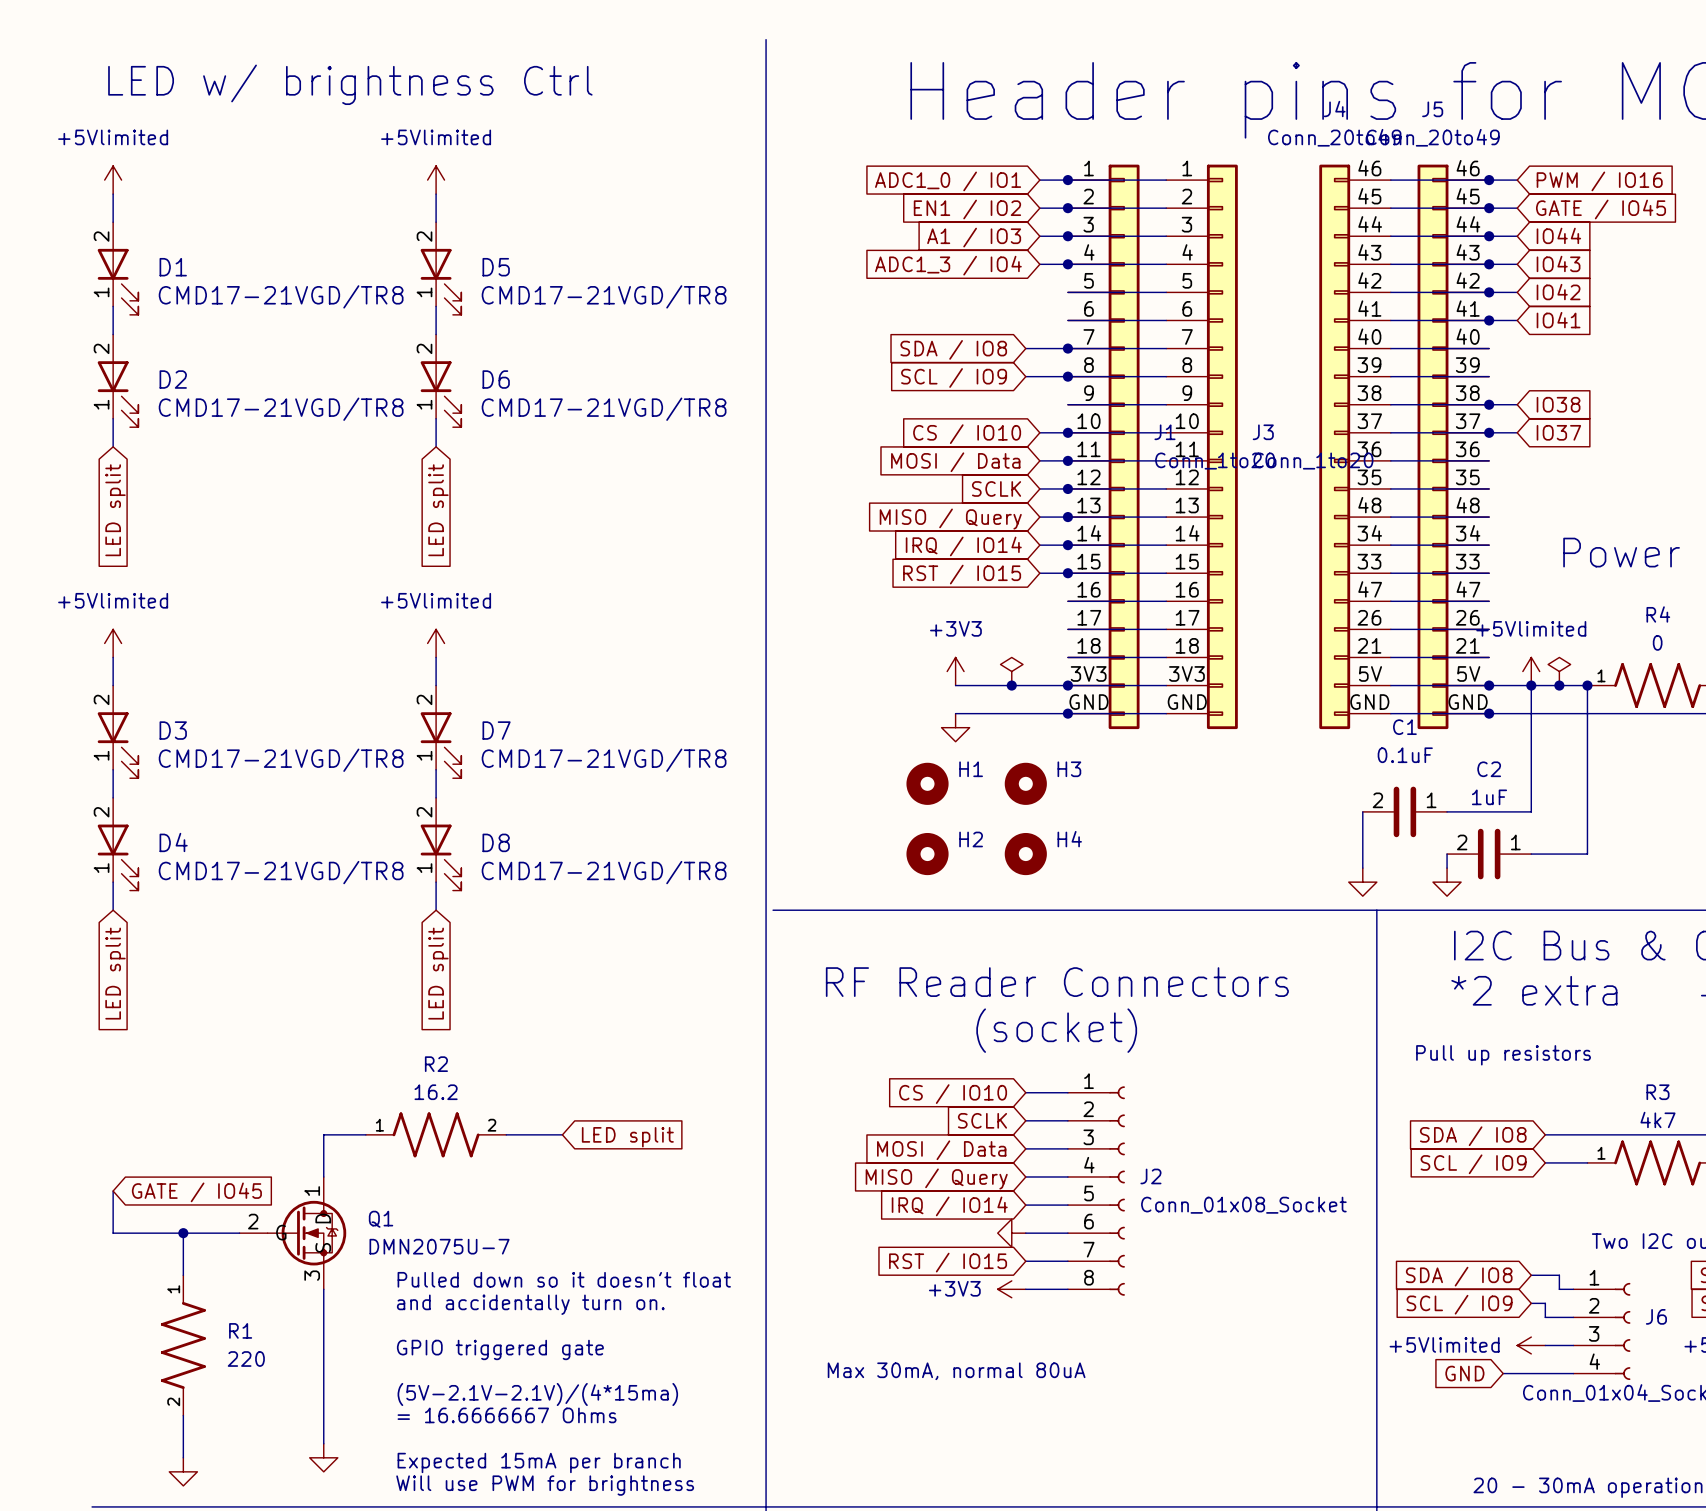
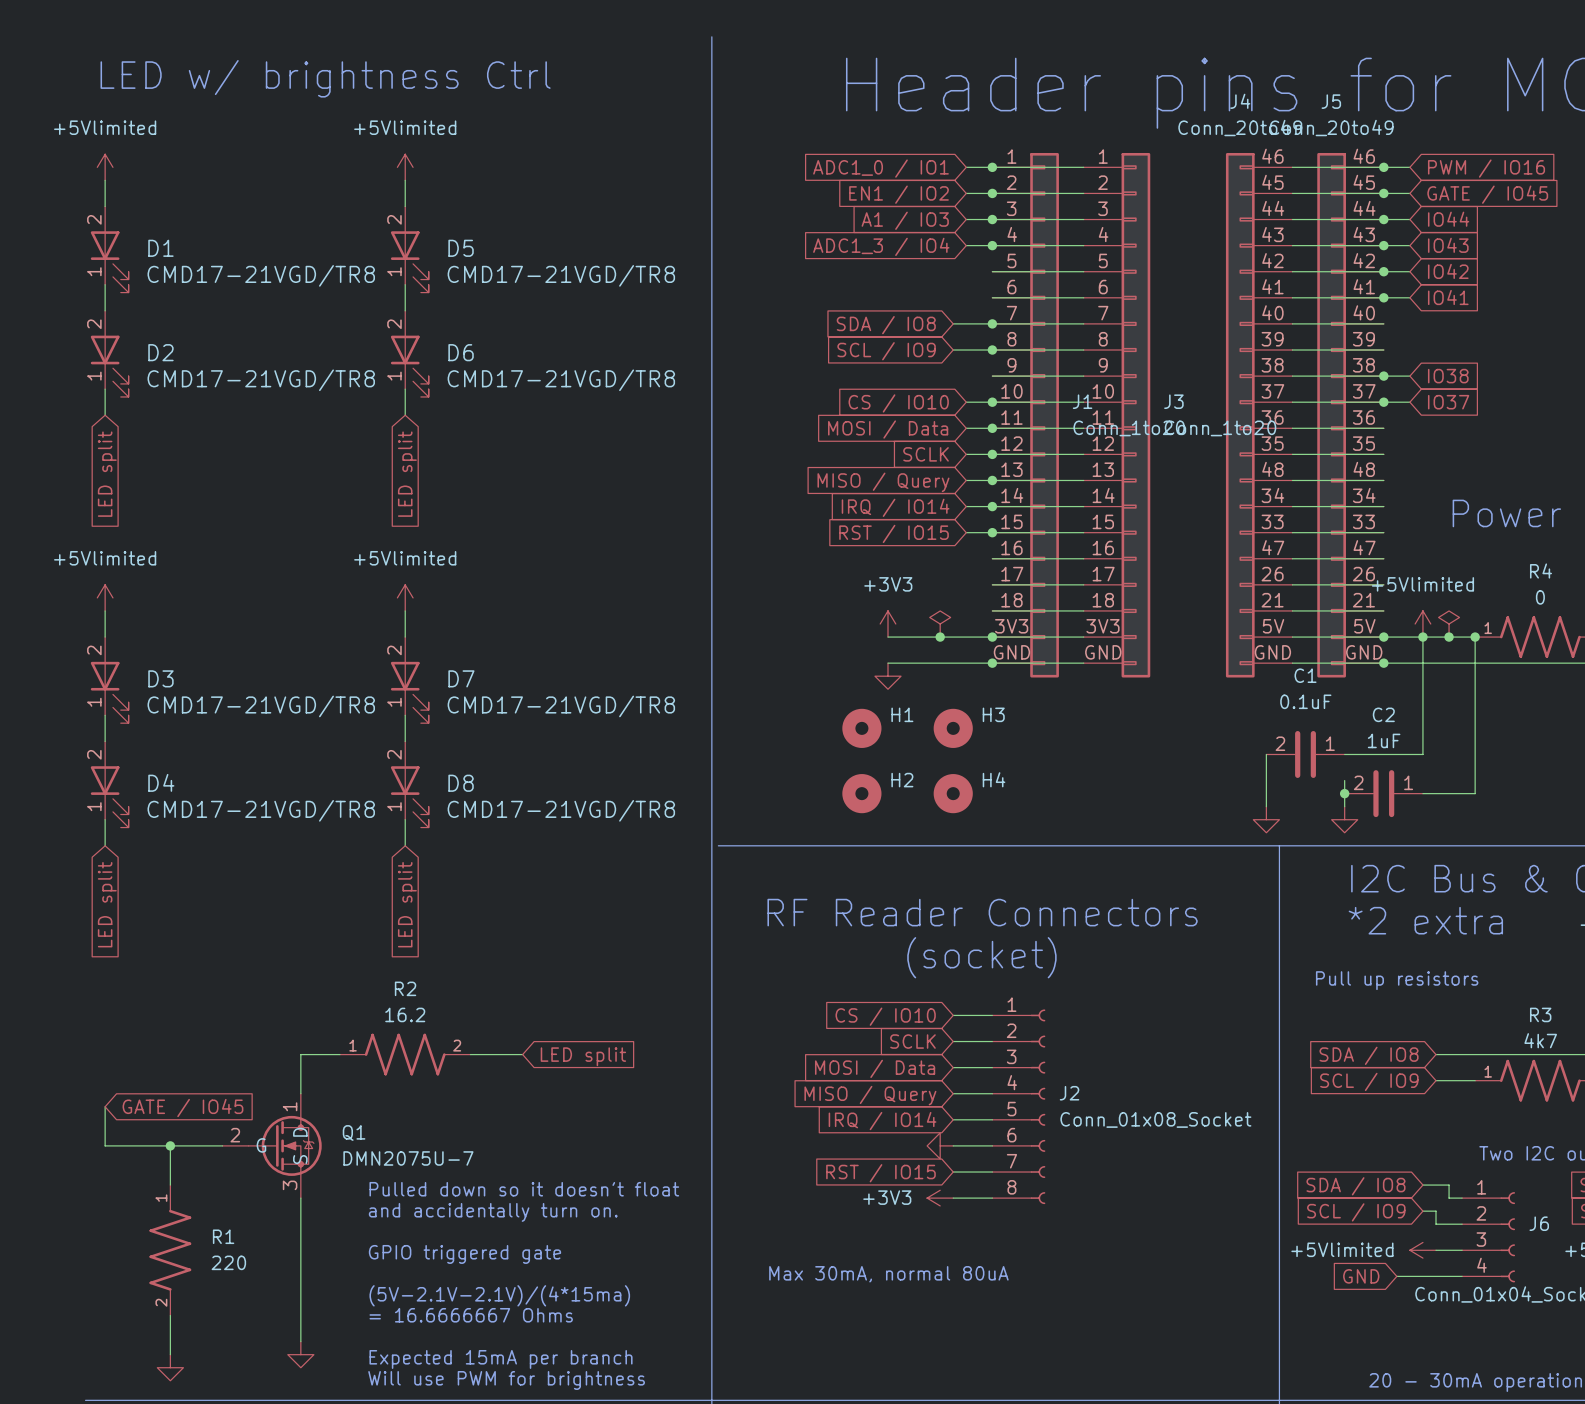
wire: none -> (1344, 780) (1344, 793)
junction: none -> (1344, 793)

